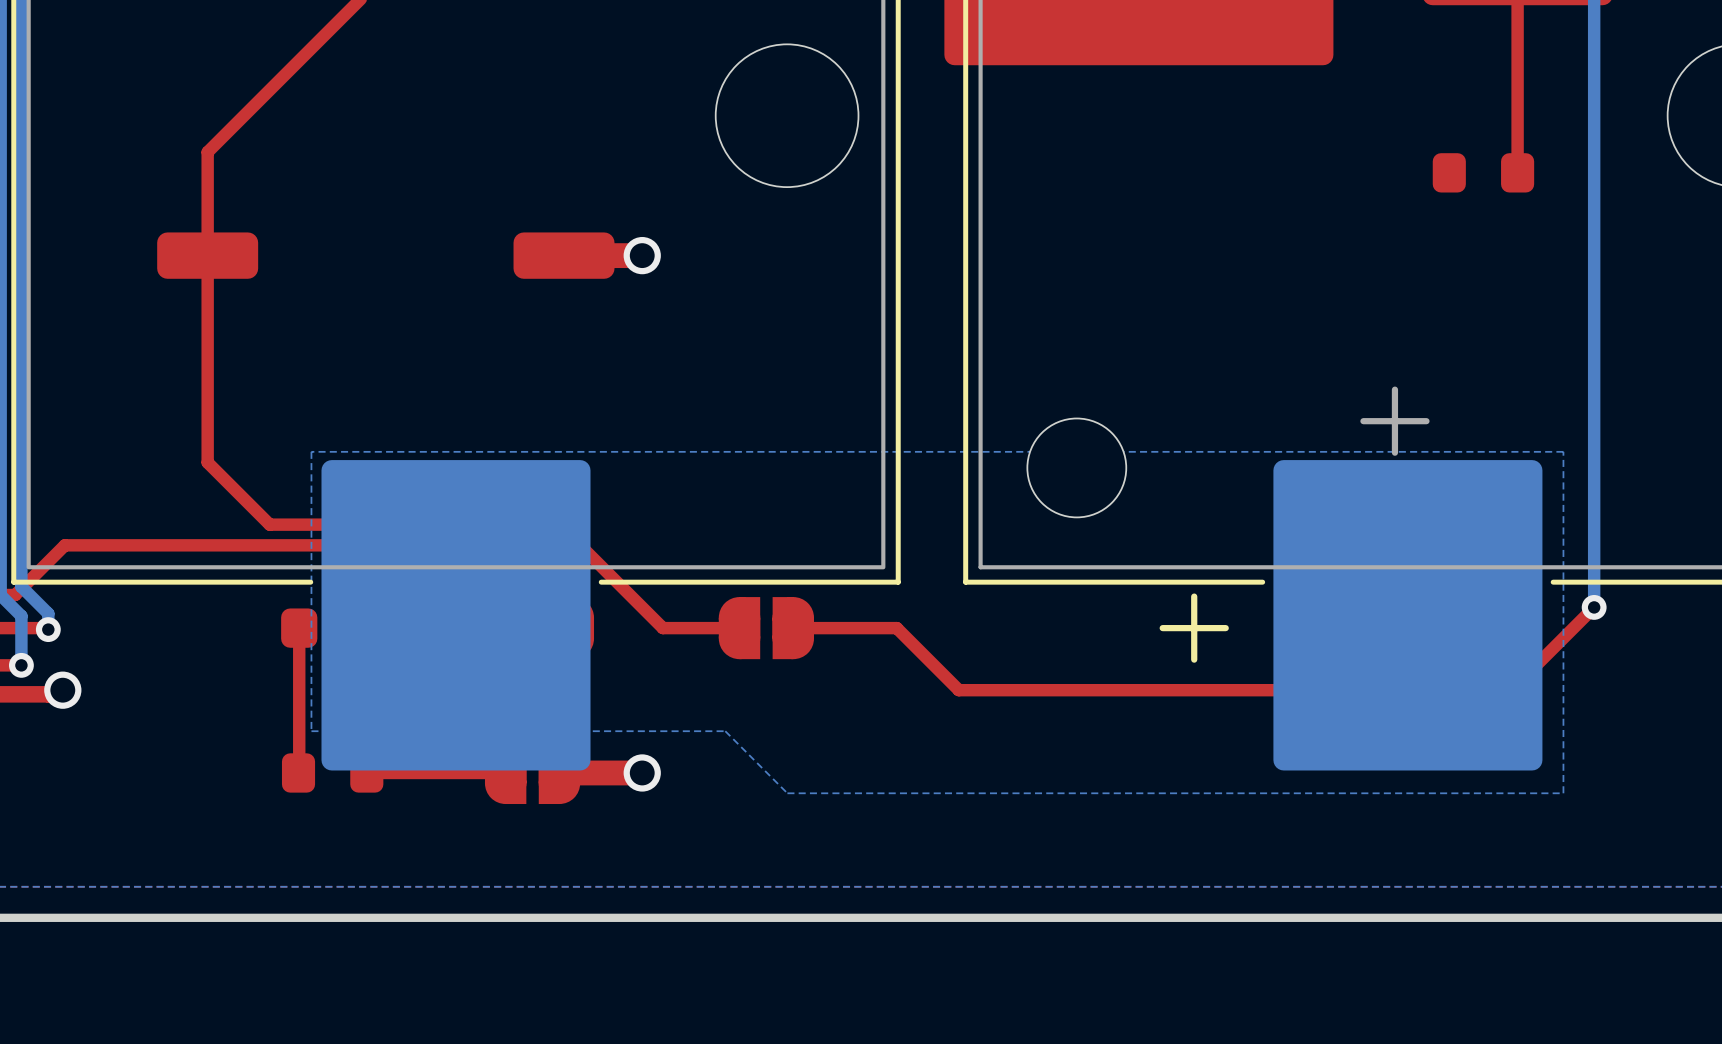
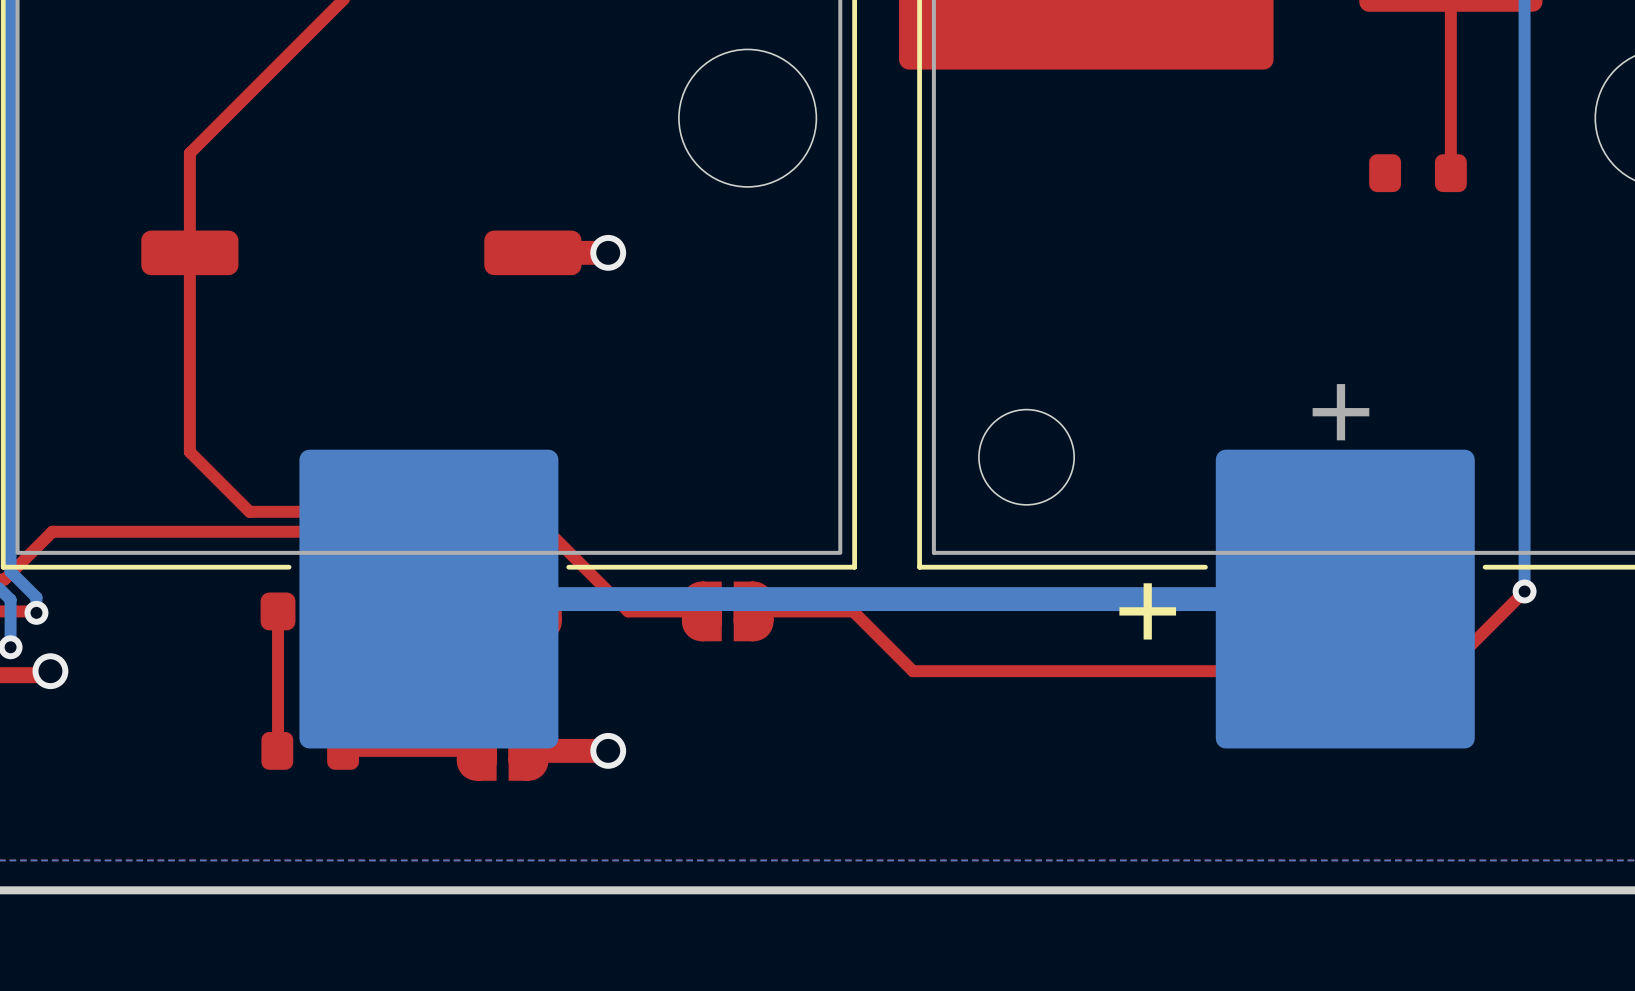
bottom zone outline: (1563, 451) (1563, 793) (787, 793) (725, 731) (311, 731) (311, 451) (1563, 451) -> none
bottom track: none -> (1345, 599) (428, 599)

